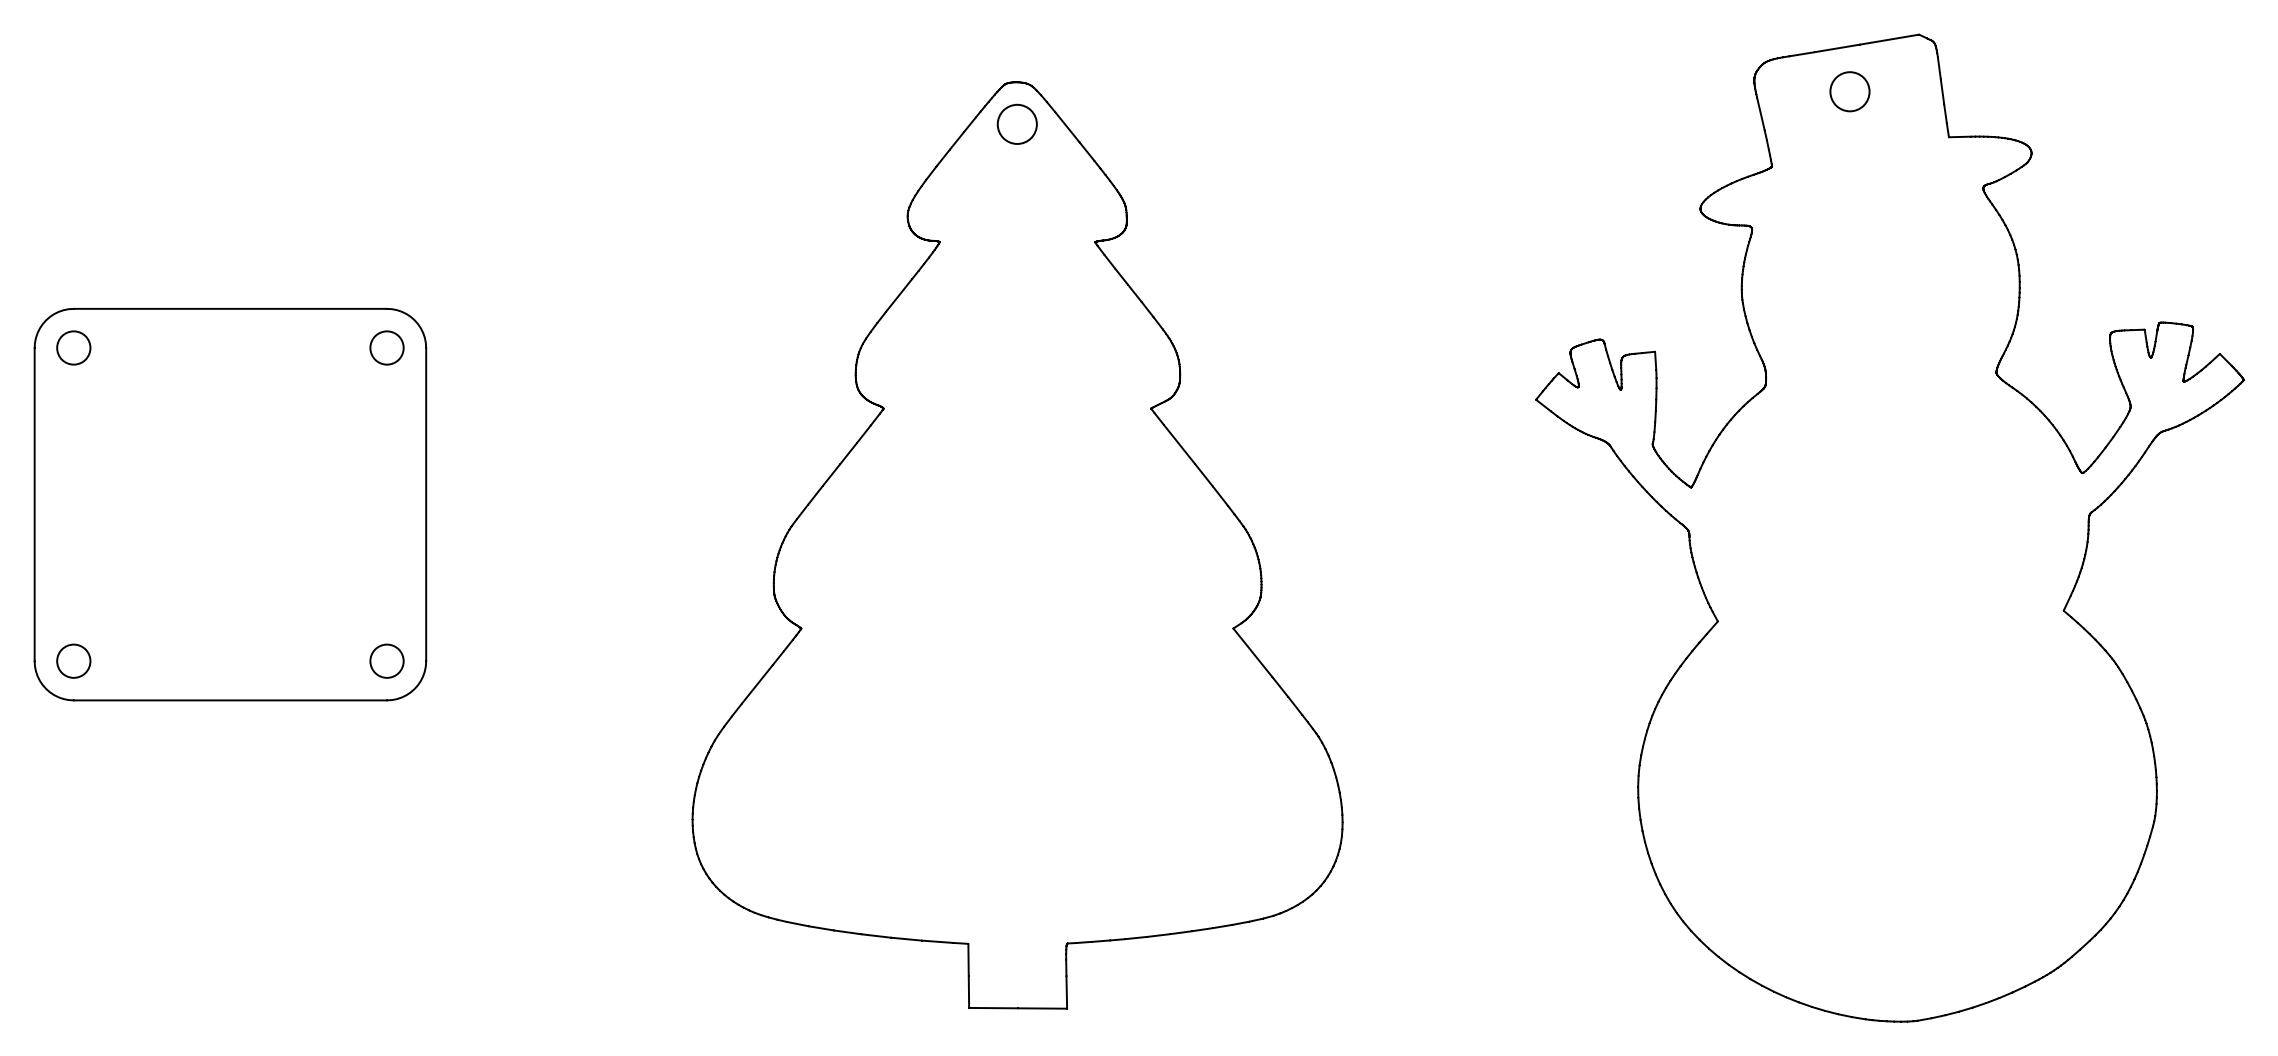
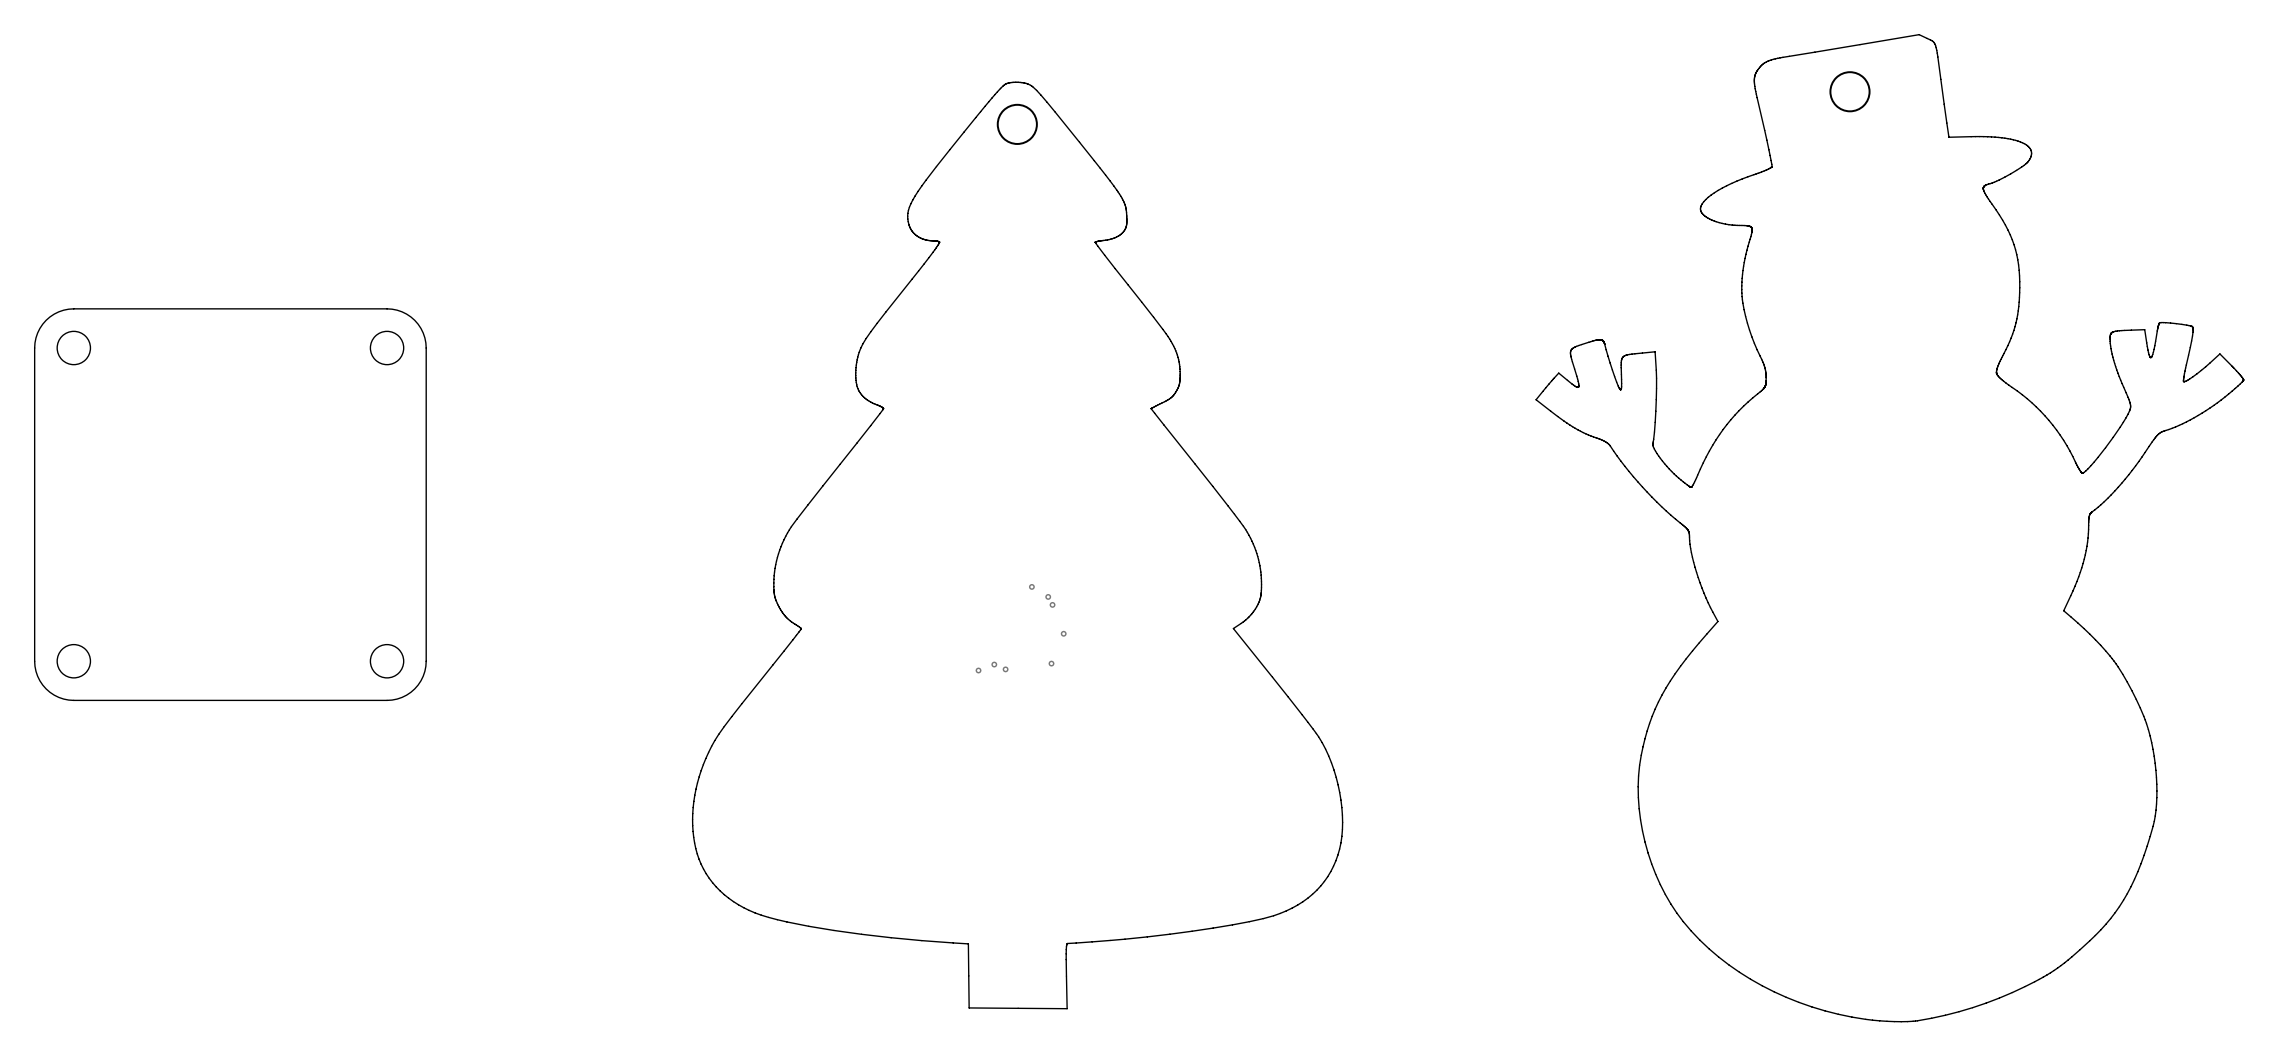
via: none -> (1031, 586)
via: none -> (1048, 596)
via: none -> (1052, 604)
via: none -> (1063, 633)
via: none -> (1051, 663)
via: none -> (994, 664)
via: none -> (1005, 669)
via: none -> (978, 670)

